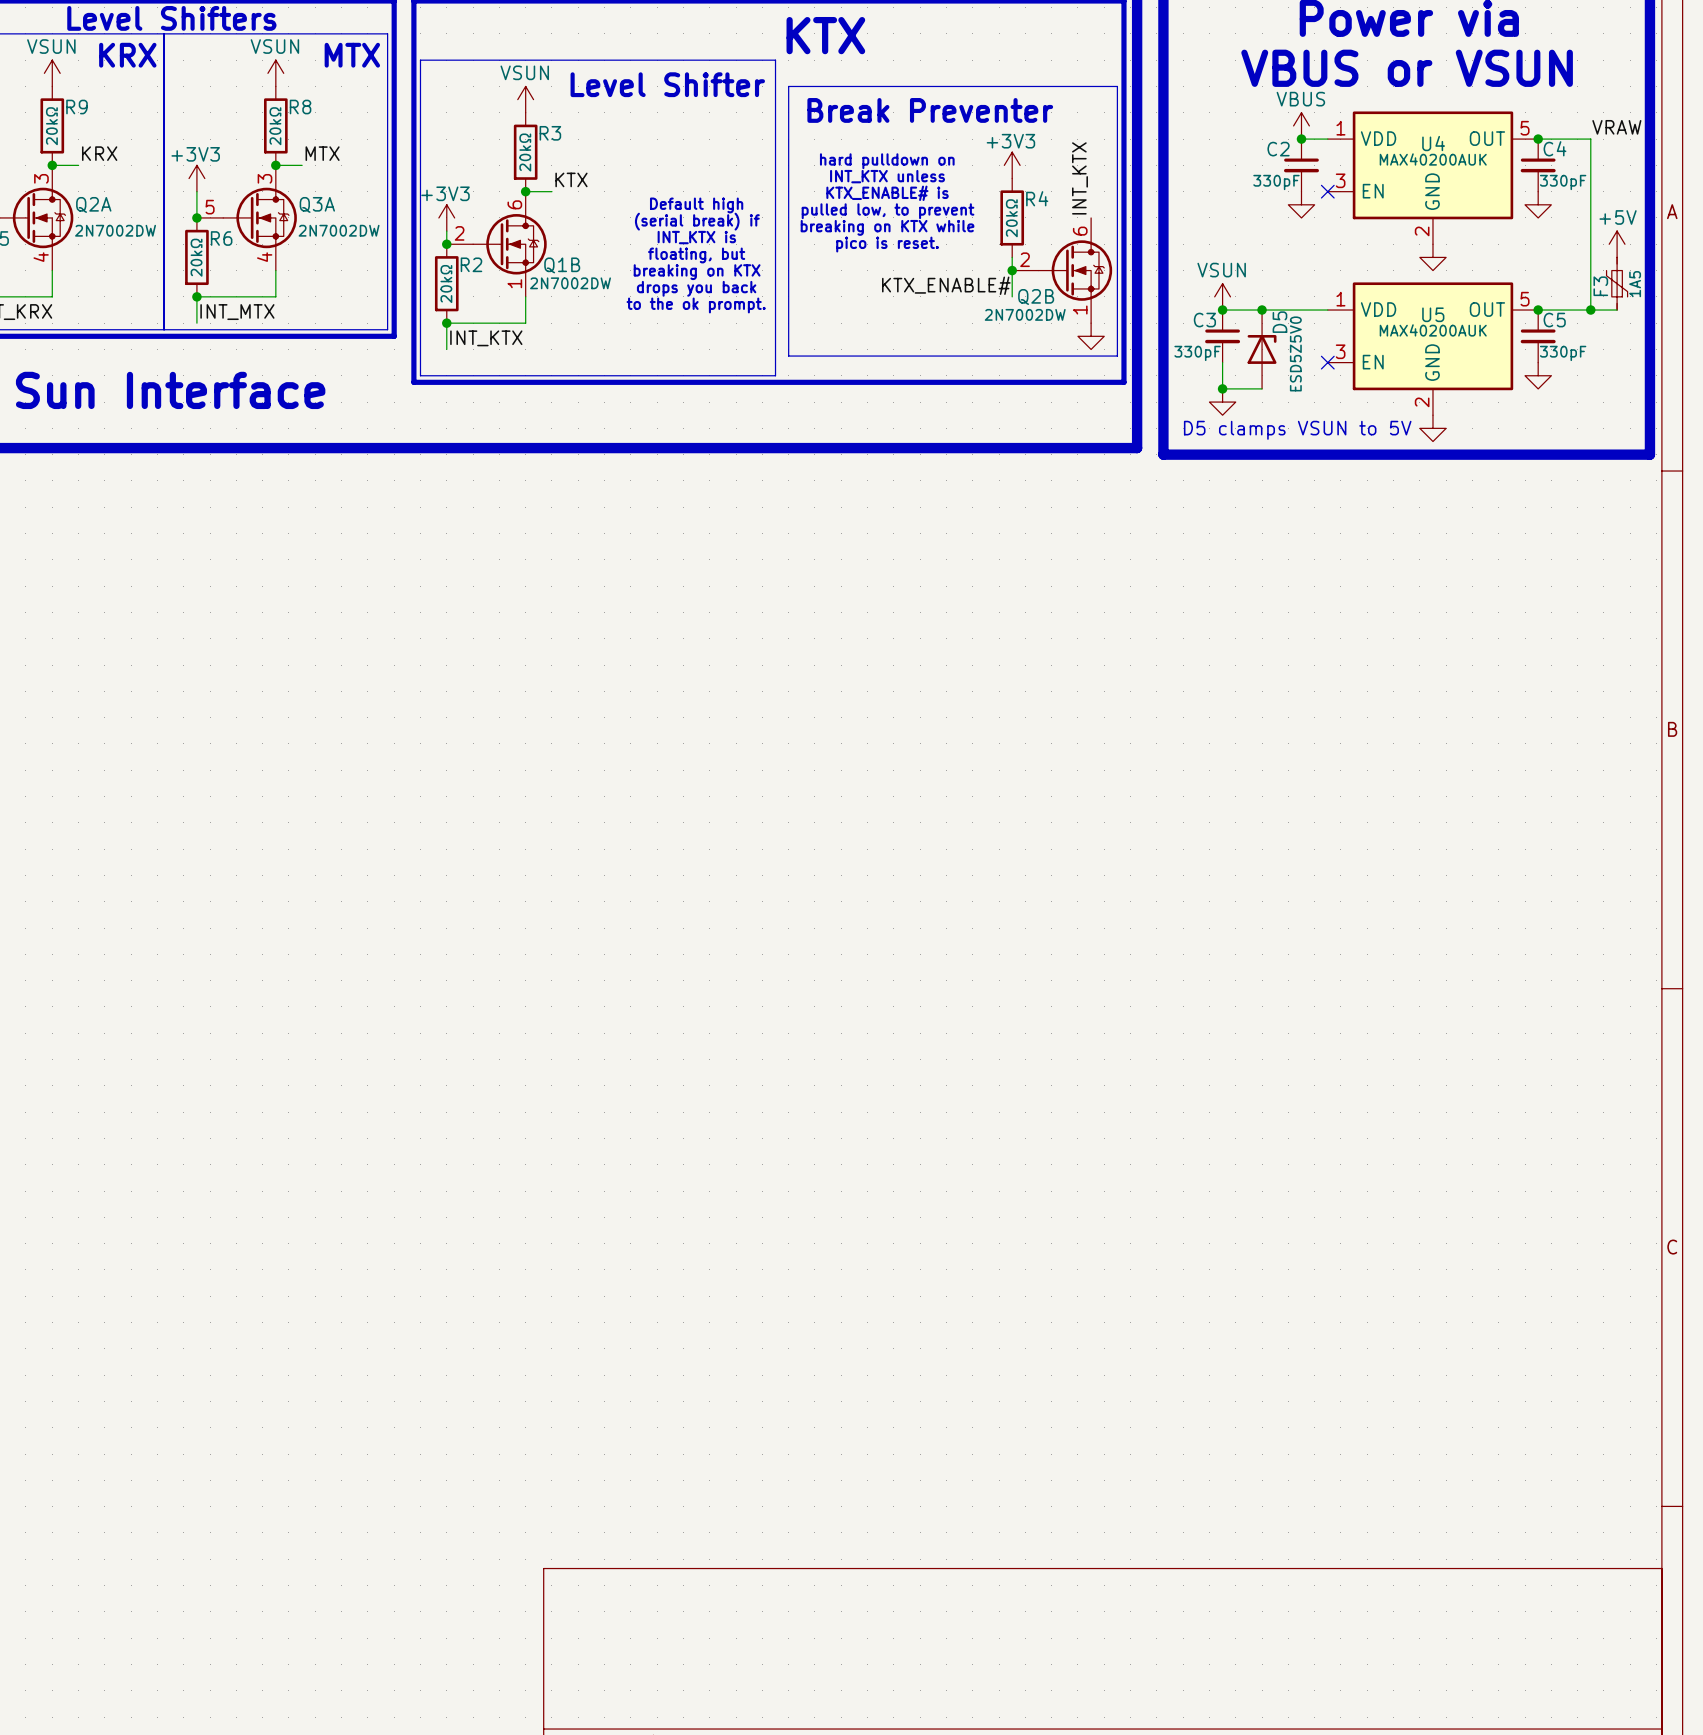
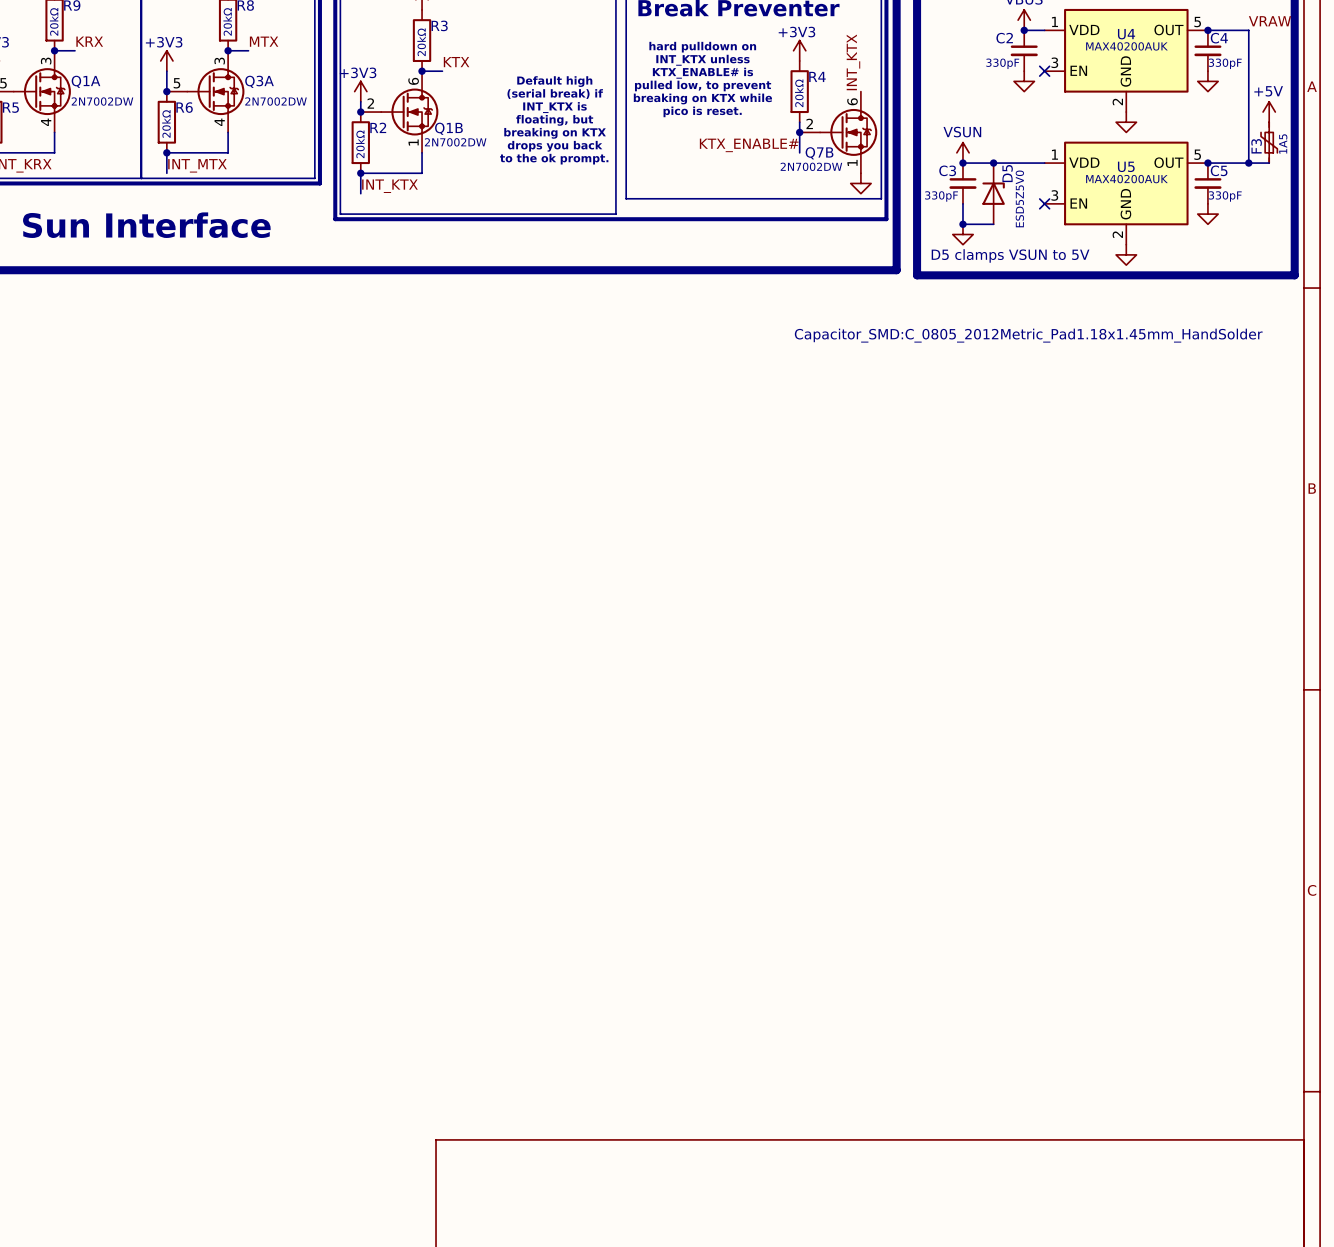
Q2A name: Q2A (93, 204) -> Q1A (86, 81)
Q2B name: Q2B (1036, 296) -> Q7B (819, 153)
text: none -> Capacitor_SMD:C_0805_2012Metric_Pad1.18x1.45mm_HandSolder (1028, 335)

